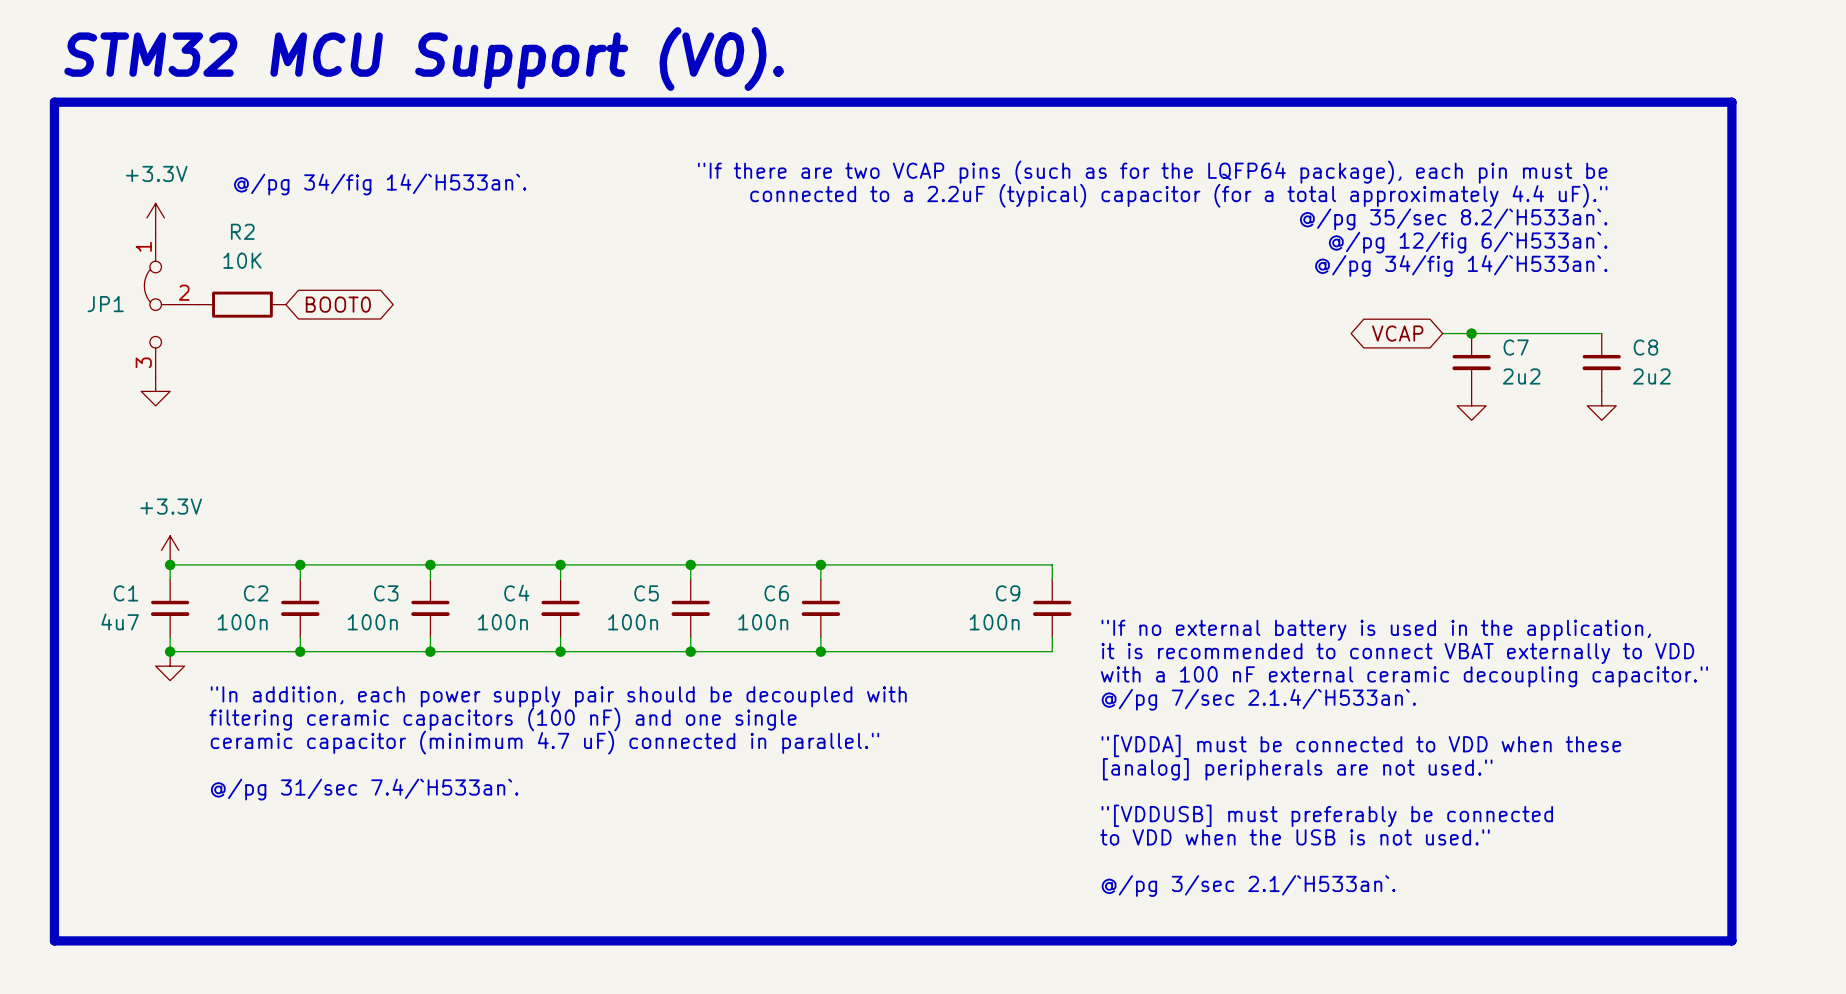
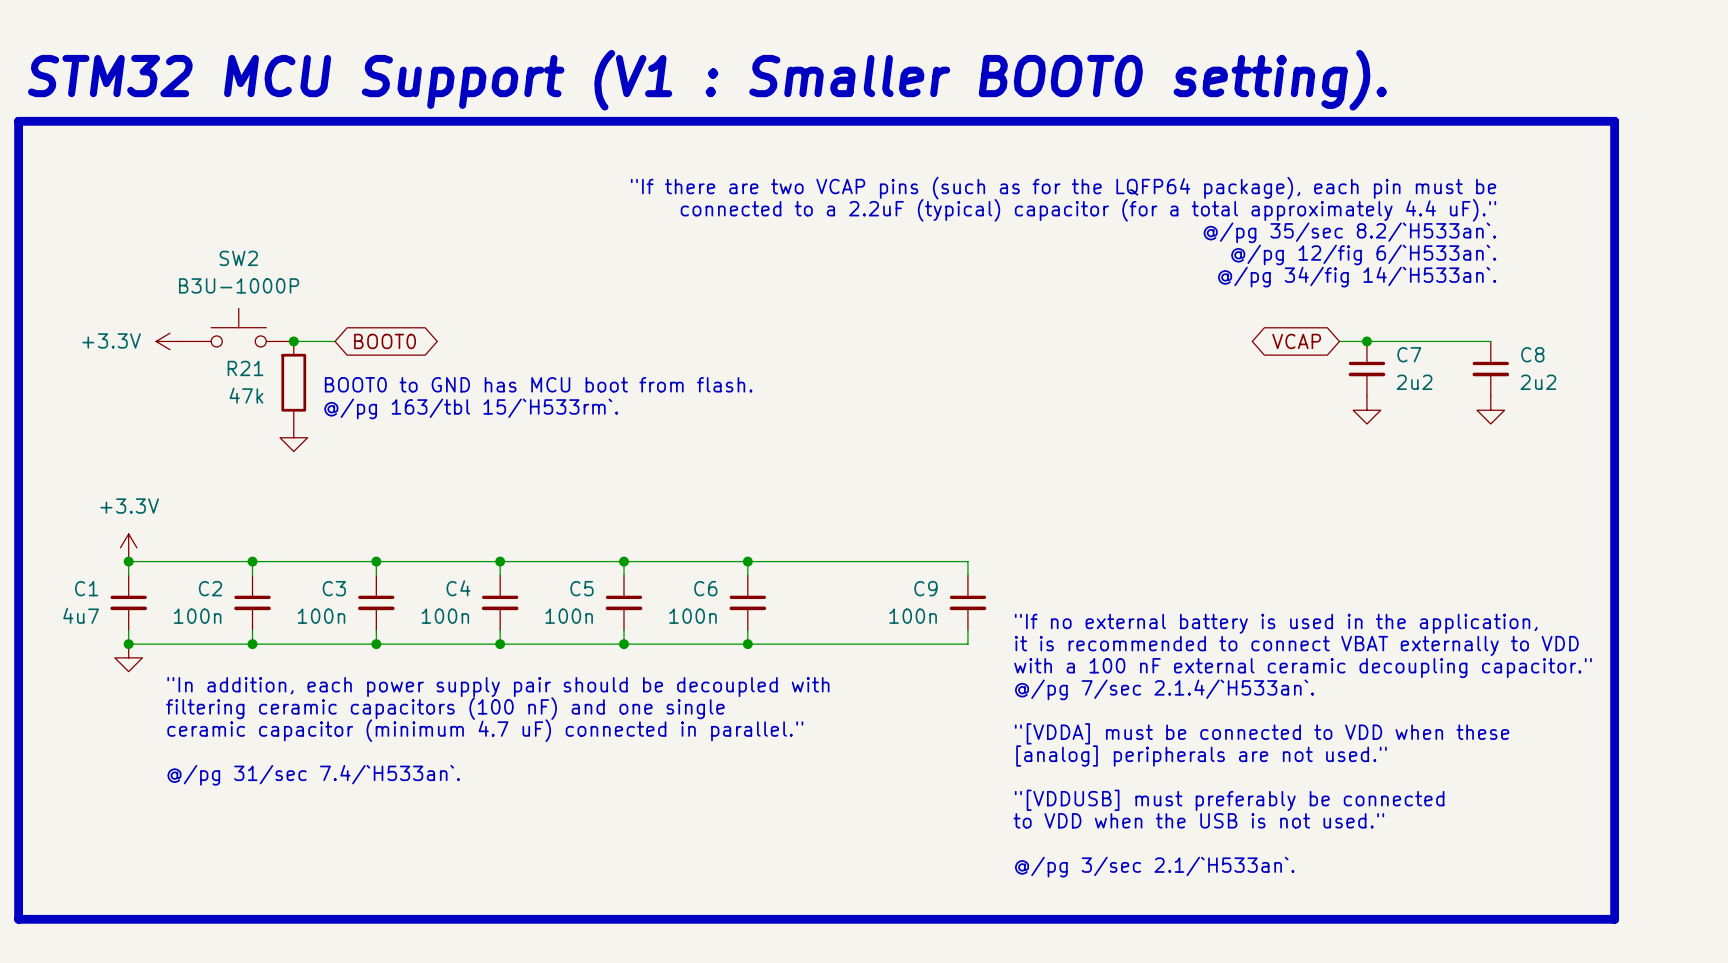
text: STM32 MCU Support (V0). (424, 59) -> STM32 MCU Support (V1 : Smaller BOOT0 setting). (707, 80)
power symbol text position: +3.3V (156, 173) -> +3.3V (111, 340)
text: @/pg 34/fig 14/`H533an`. (380, 184) -> none
power symbol rotation: 0° (155, 217) -> 90° counterclockwise (169, 341)
power symbol position: +3.3V (155, 217) -> +3.3V (169, 341)
JP1: (171, 304) -> none
R2: 10K (242, 304) -> none
global label position: BOOT0 (338, 304) -> BOOT0 (385, 341)
SW2: none -> B3U-1000P (238, 327)
wire: none -> (293, 341) (335, 341)
junction: none -> (293, 341)
R21: none -> 47k (293, 382)
text: none -> BOOT0 to GND has MCU boot from flash. (538, 384)
power symbol position: (155, 391) -> (293, 437)
text: none -> @/pg 163/tbl 15/`H533rm`. (471, 408)

